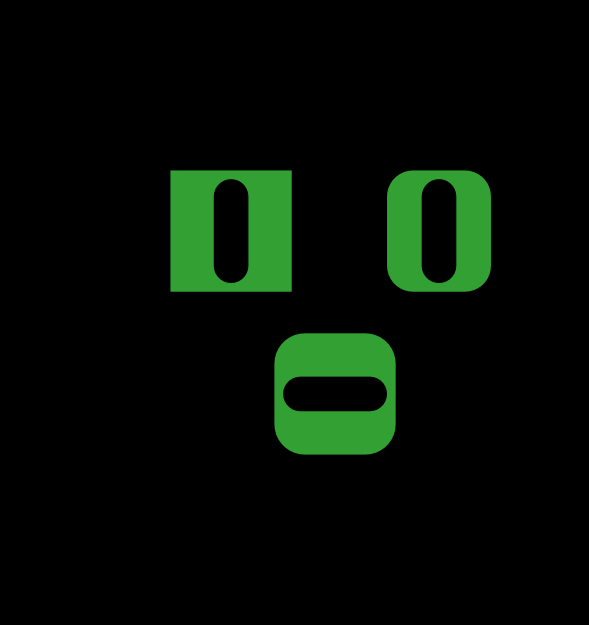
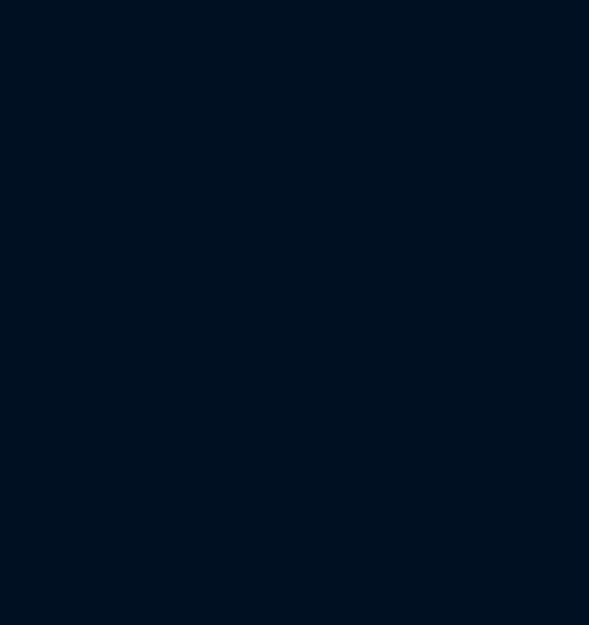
part: (330, 312) -> none

